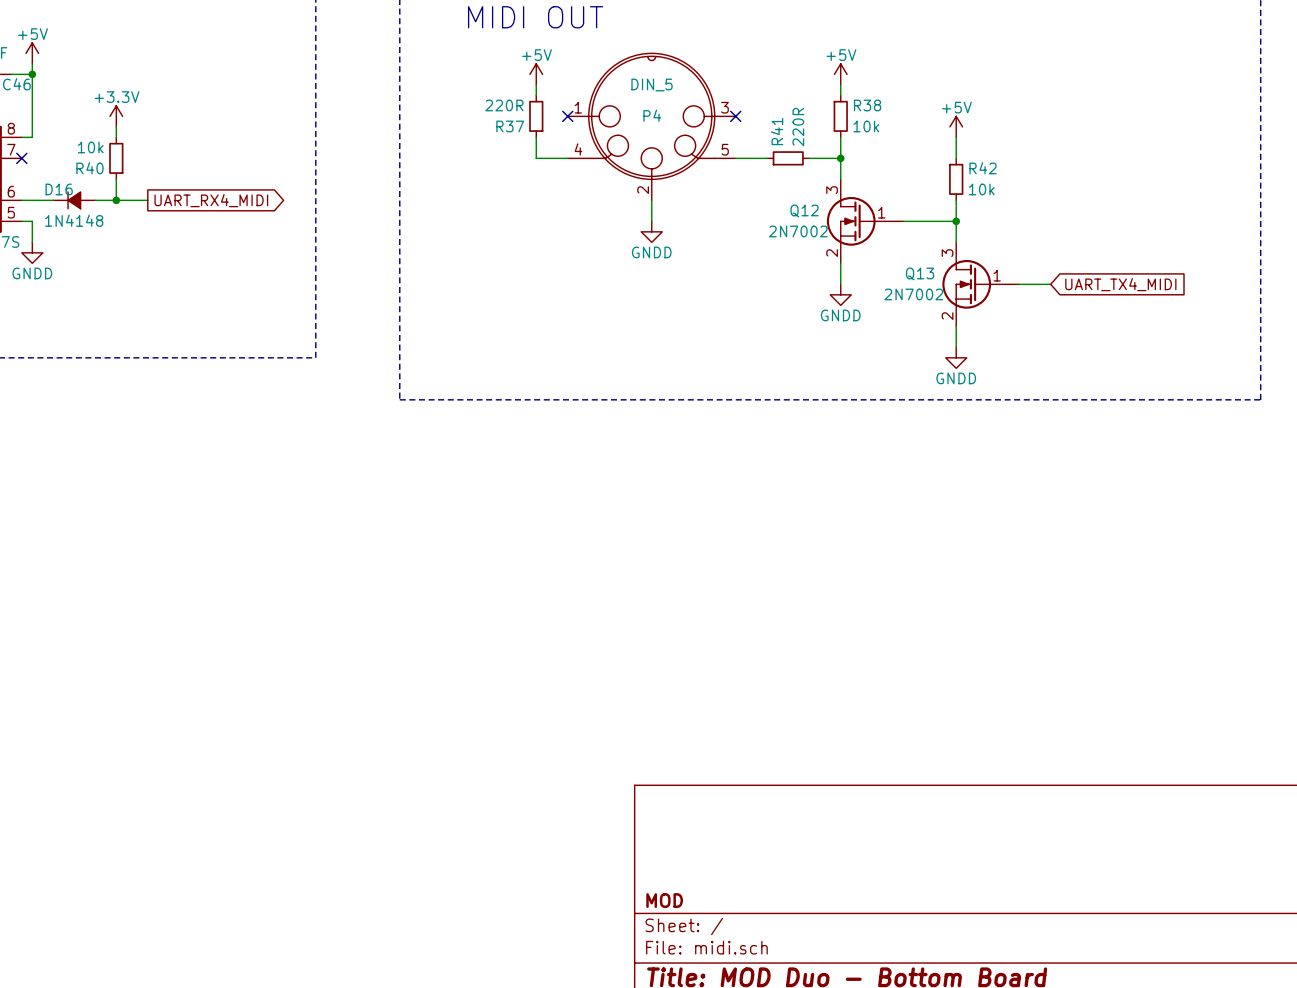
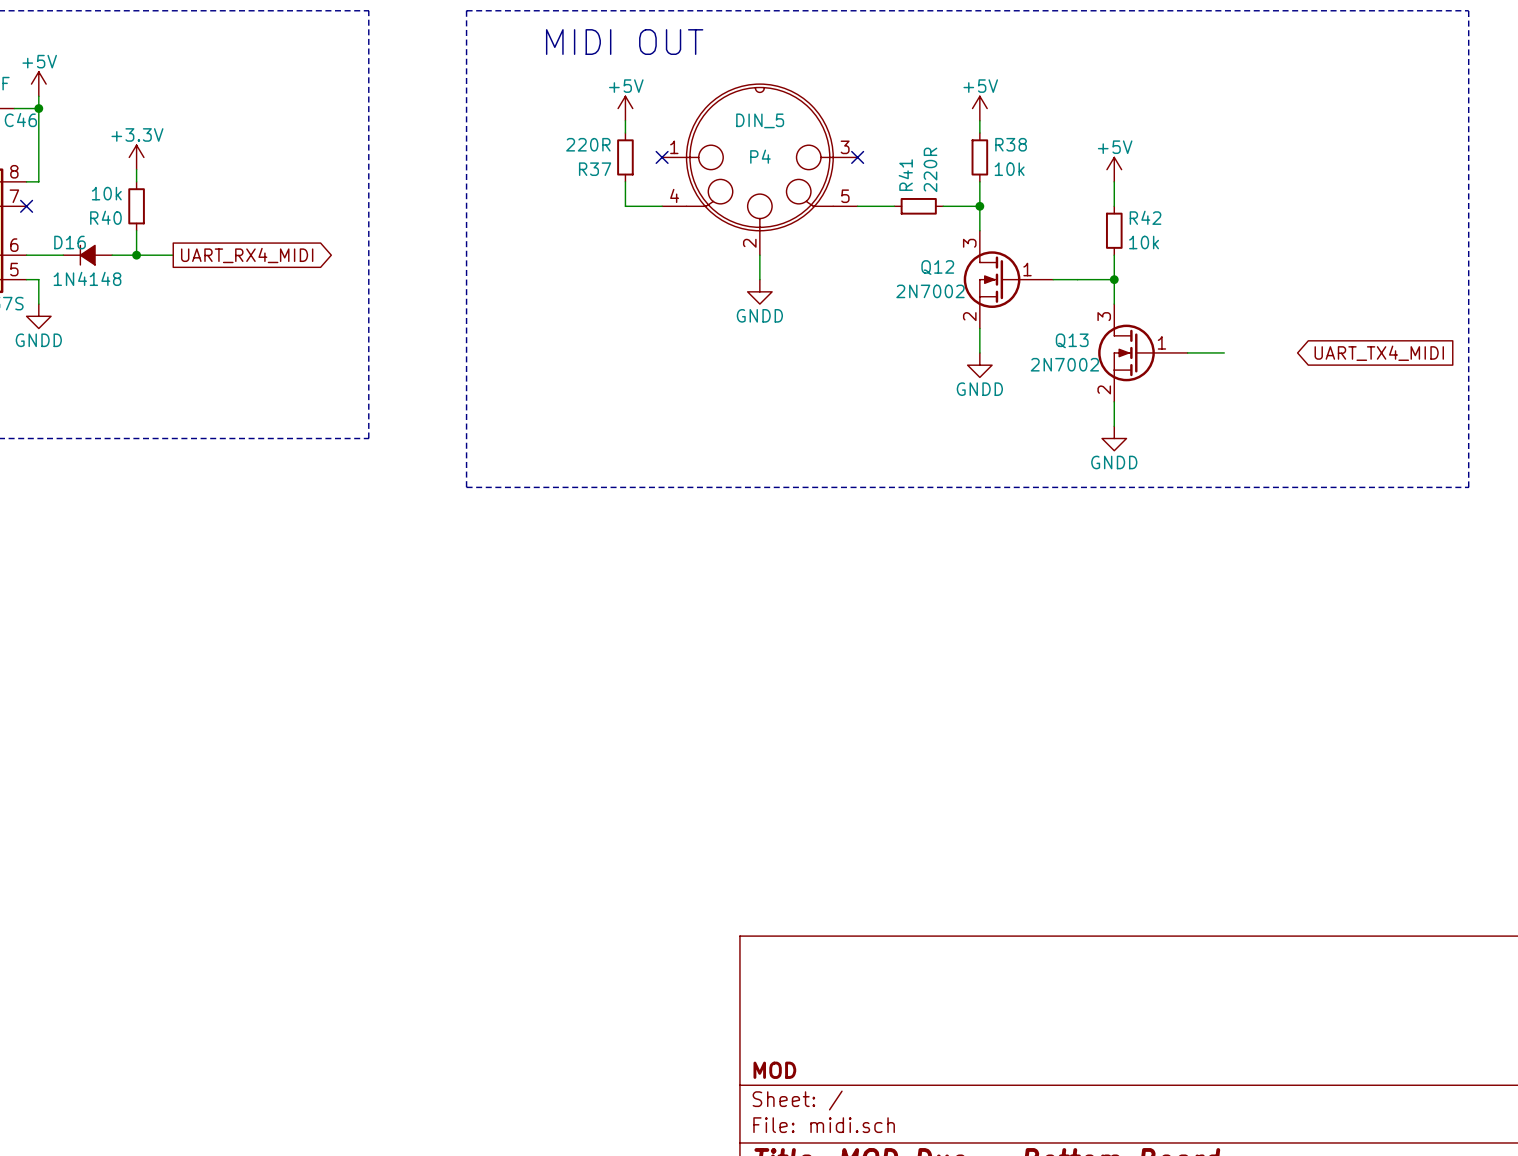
global label position: UART_TX4_MIDI (1120, 284) -> UART_TX4_MIDI (1379, 353)

